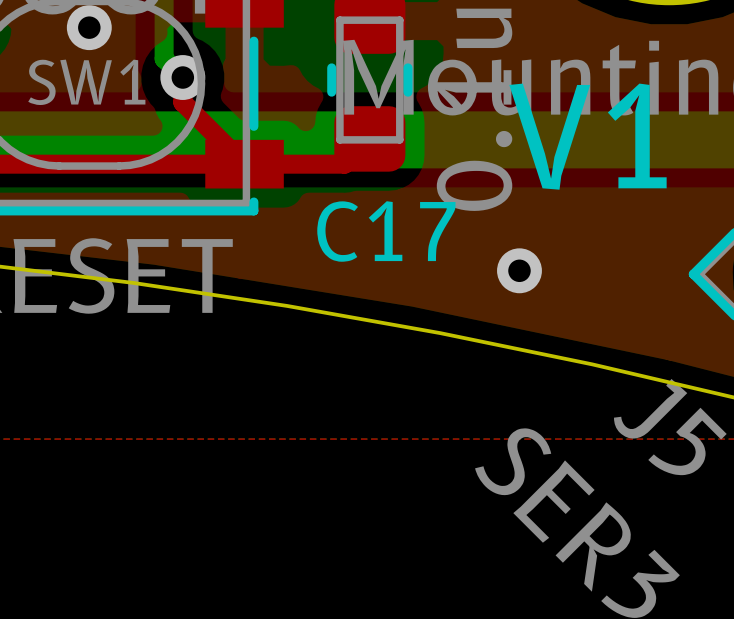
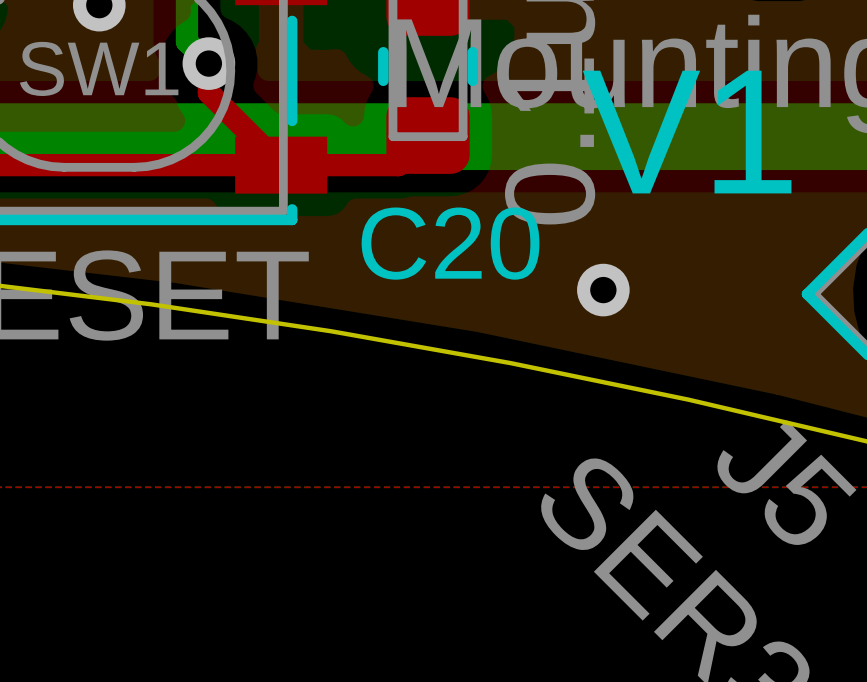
C17 name: C17 (386, 231) -> C20 (450, 243)

